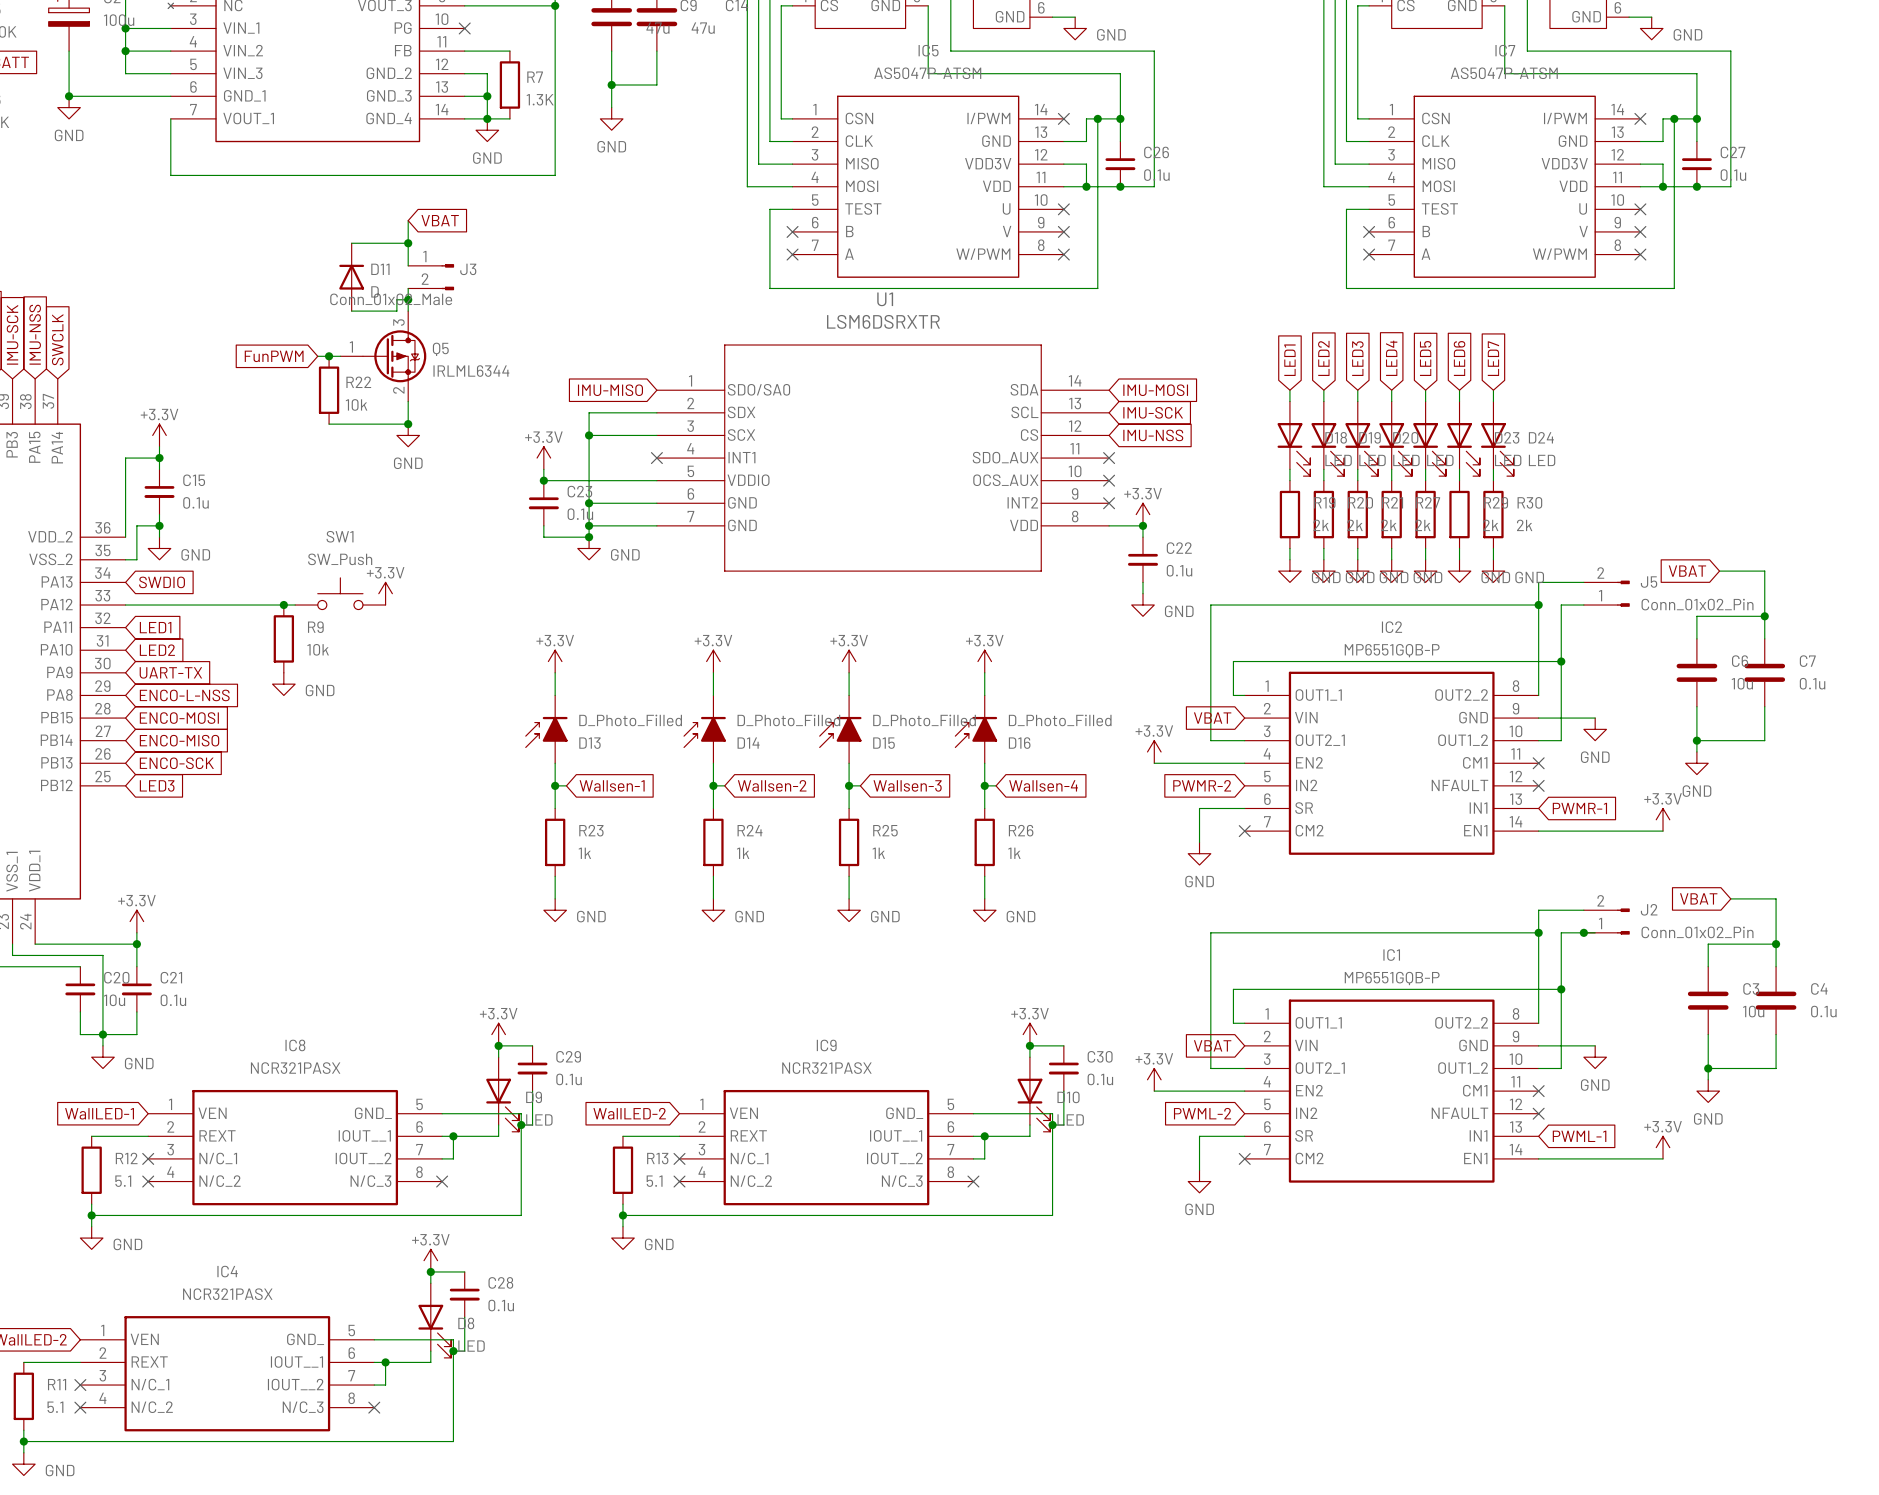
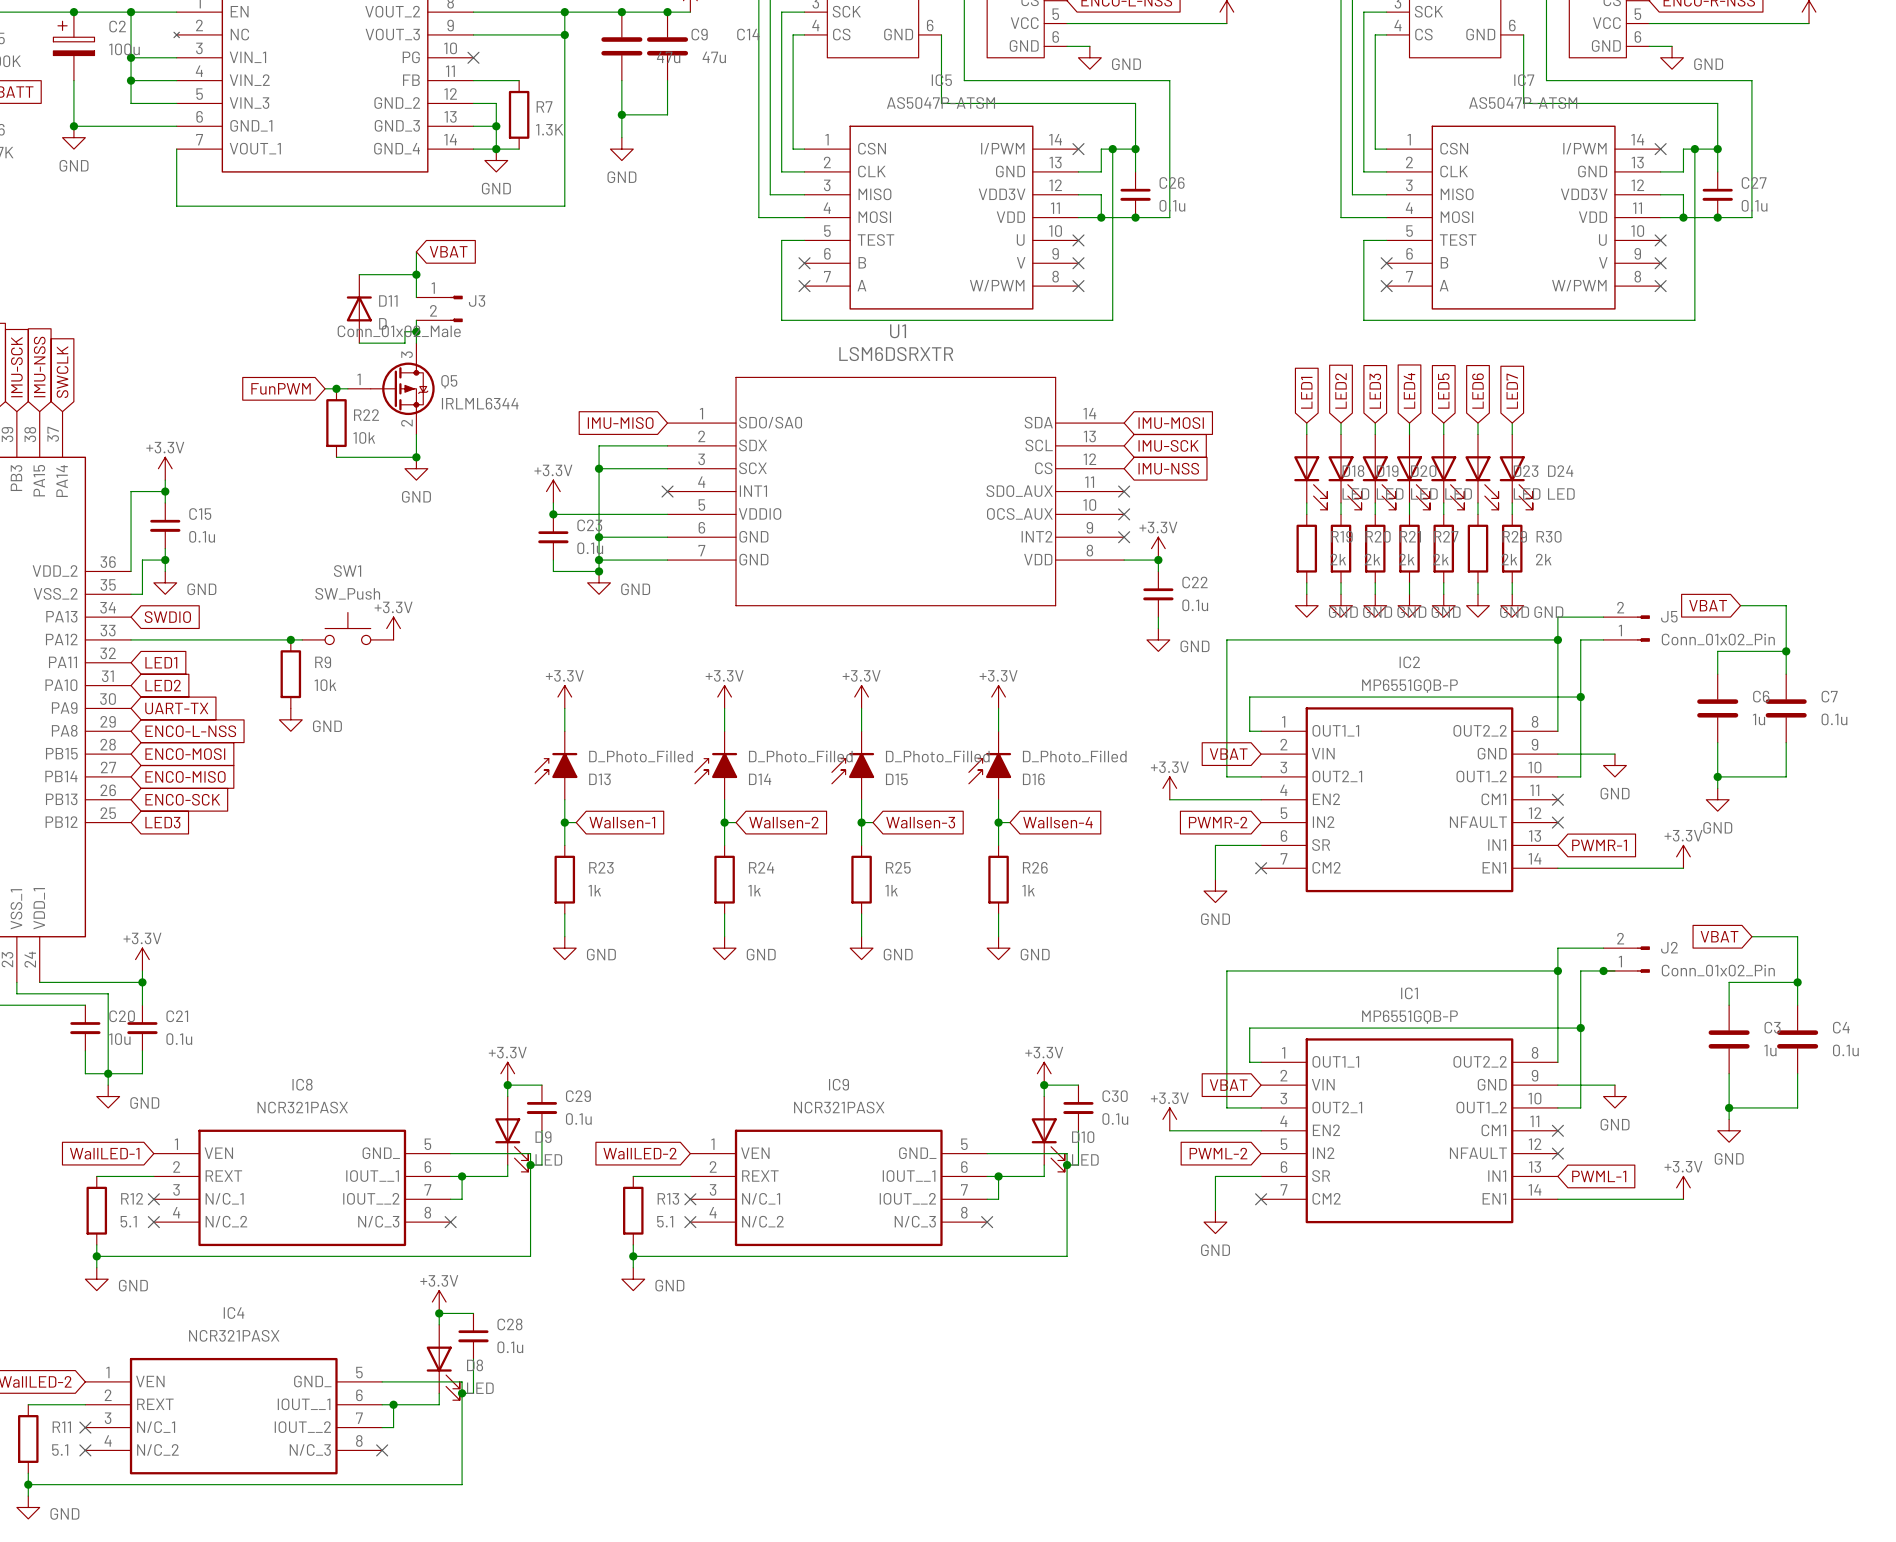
C6 value: 10u (1742, 683) -> 1u (1759, 719)
C3 value: 10u (1753, 1011) -> 1u (1770, 1050)

